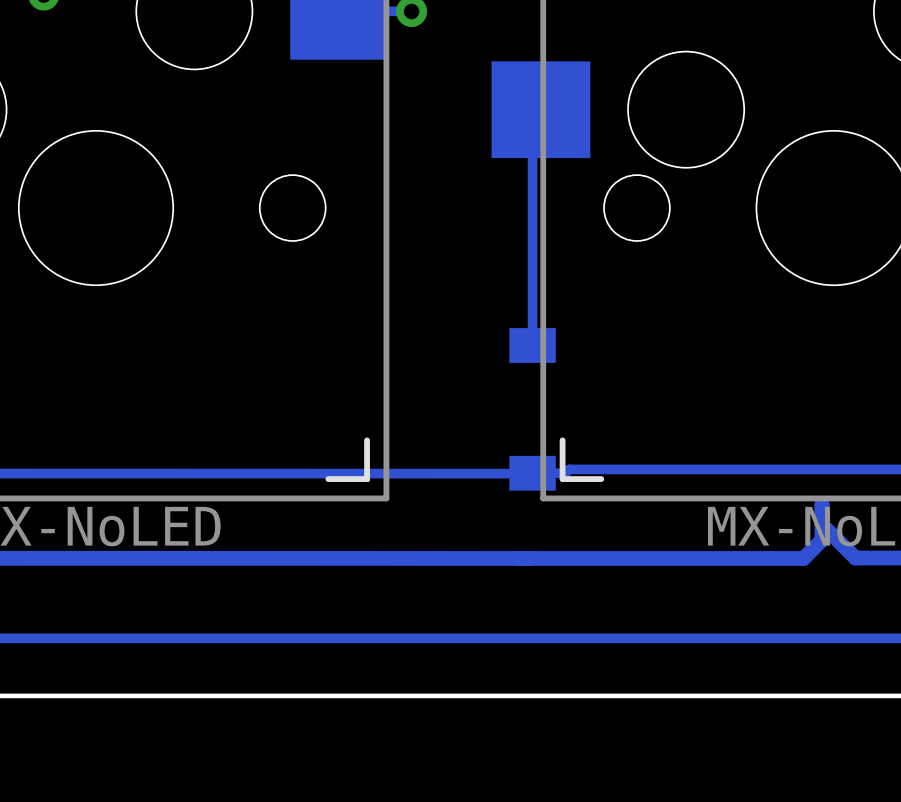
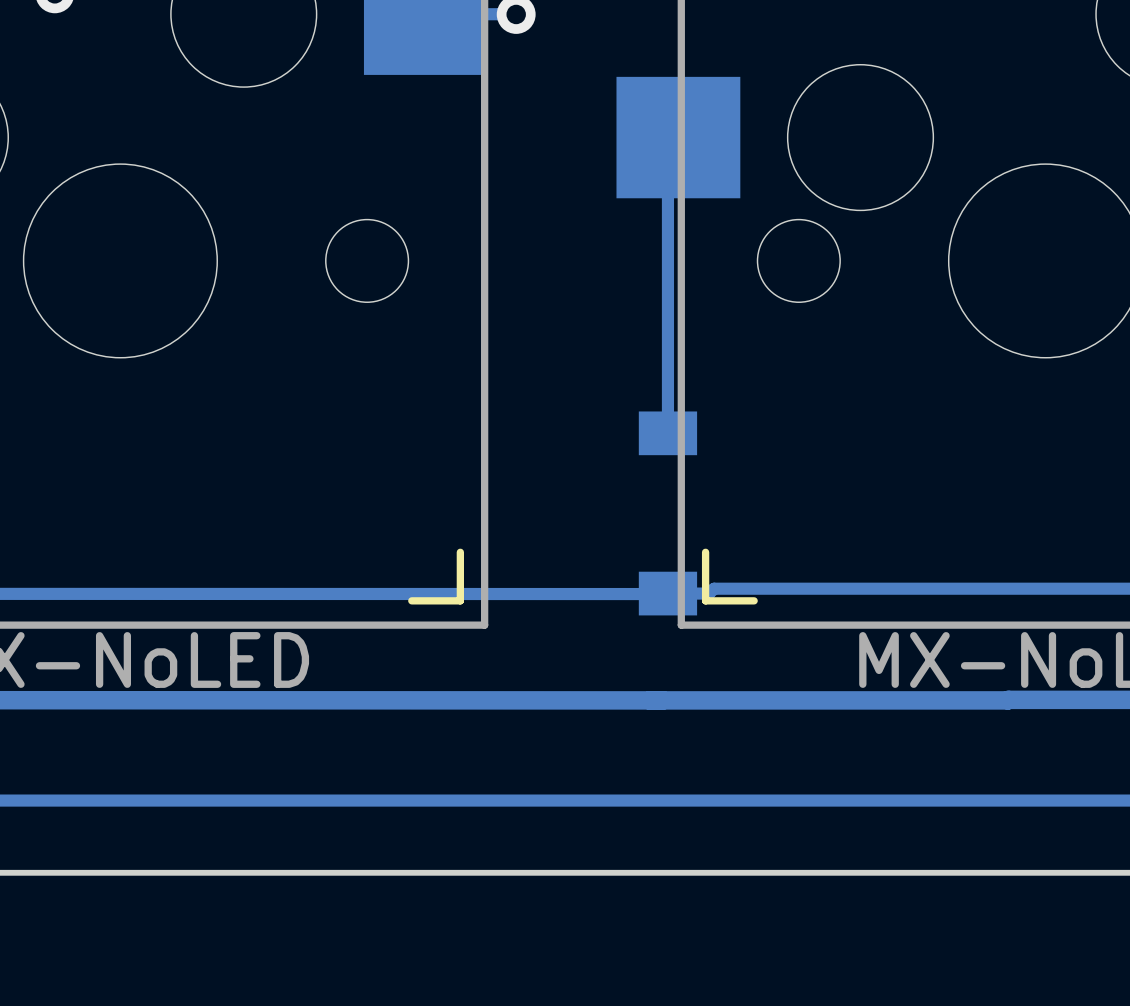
bottom track: (822, 504) (822, 540) (804, 558) -> none
bottom track: (822, 524) (855, 558) -> (1008, 699) (1072, 699)

